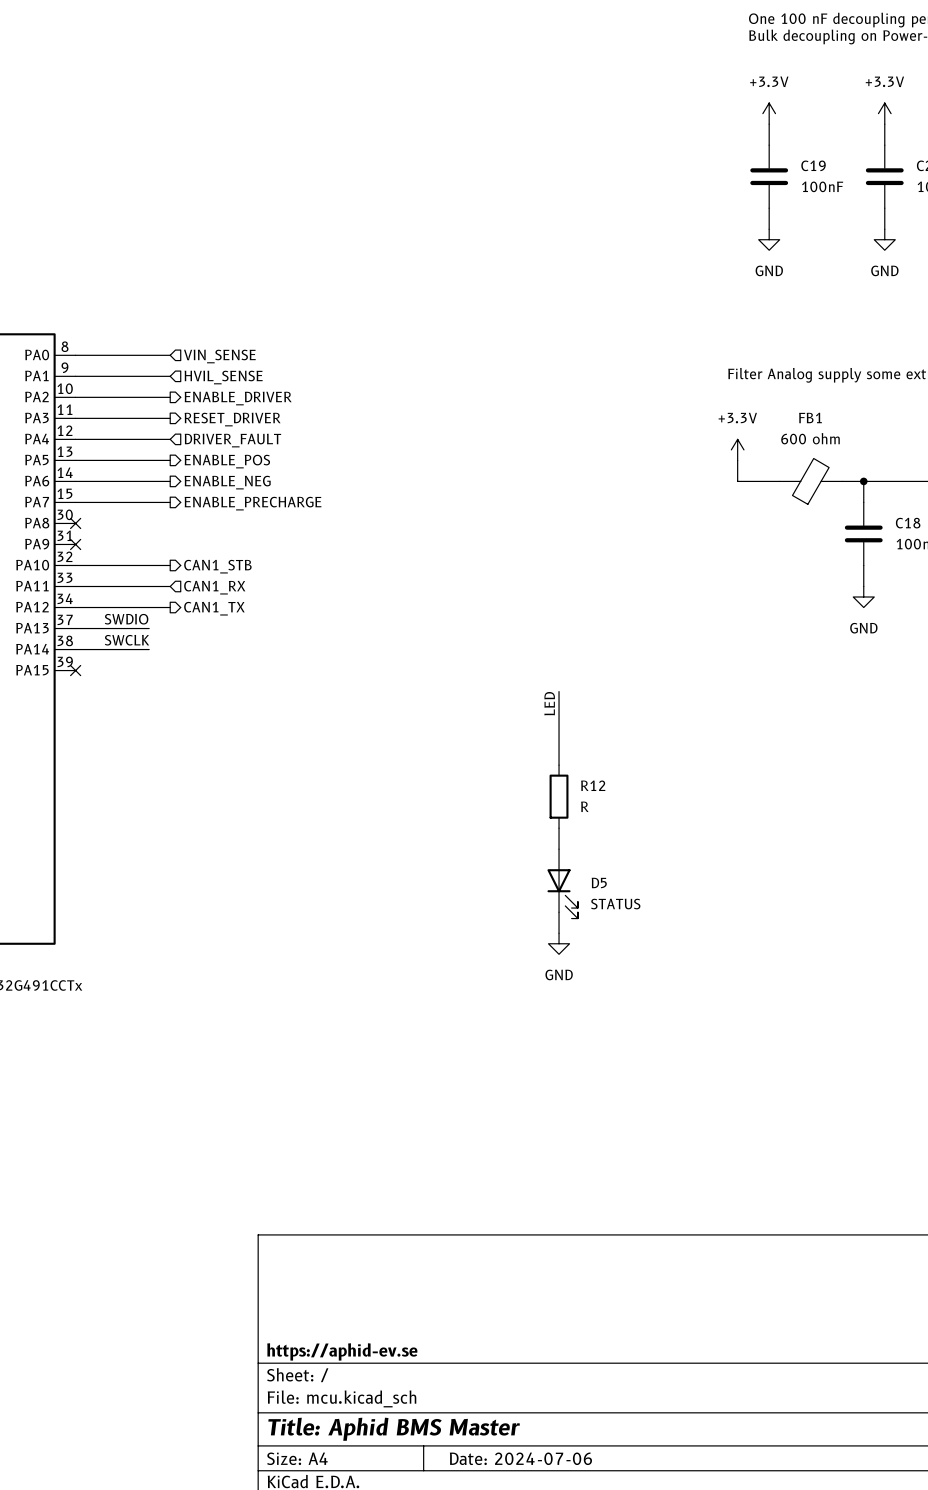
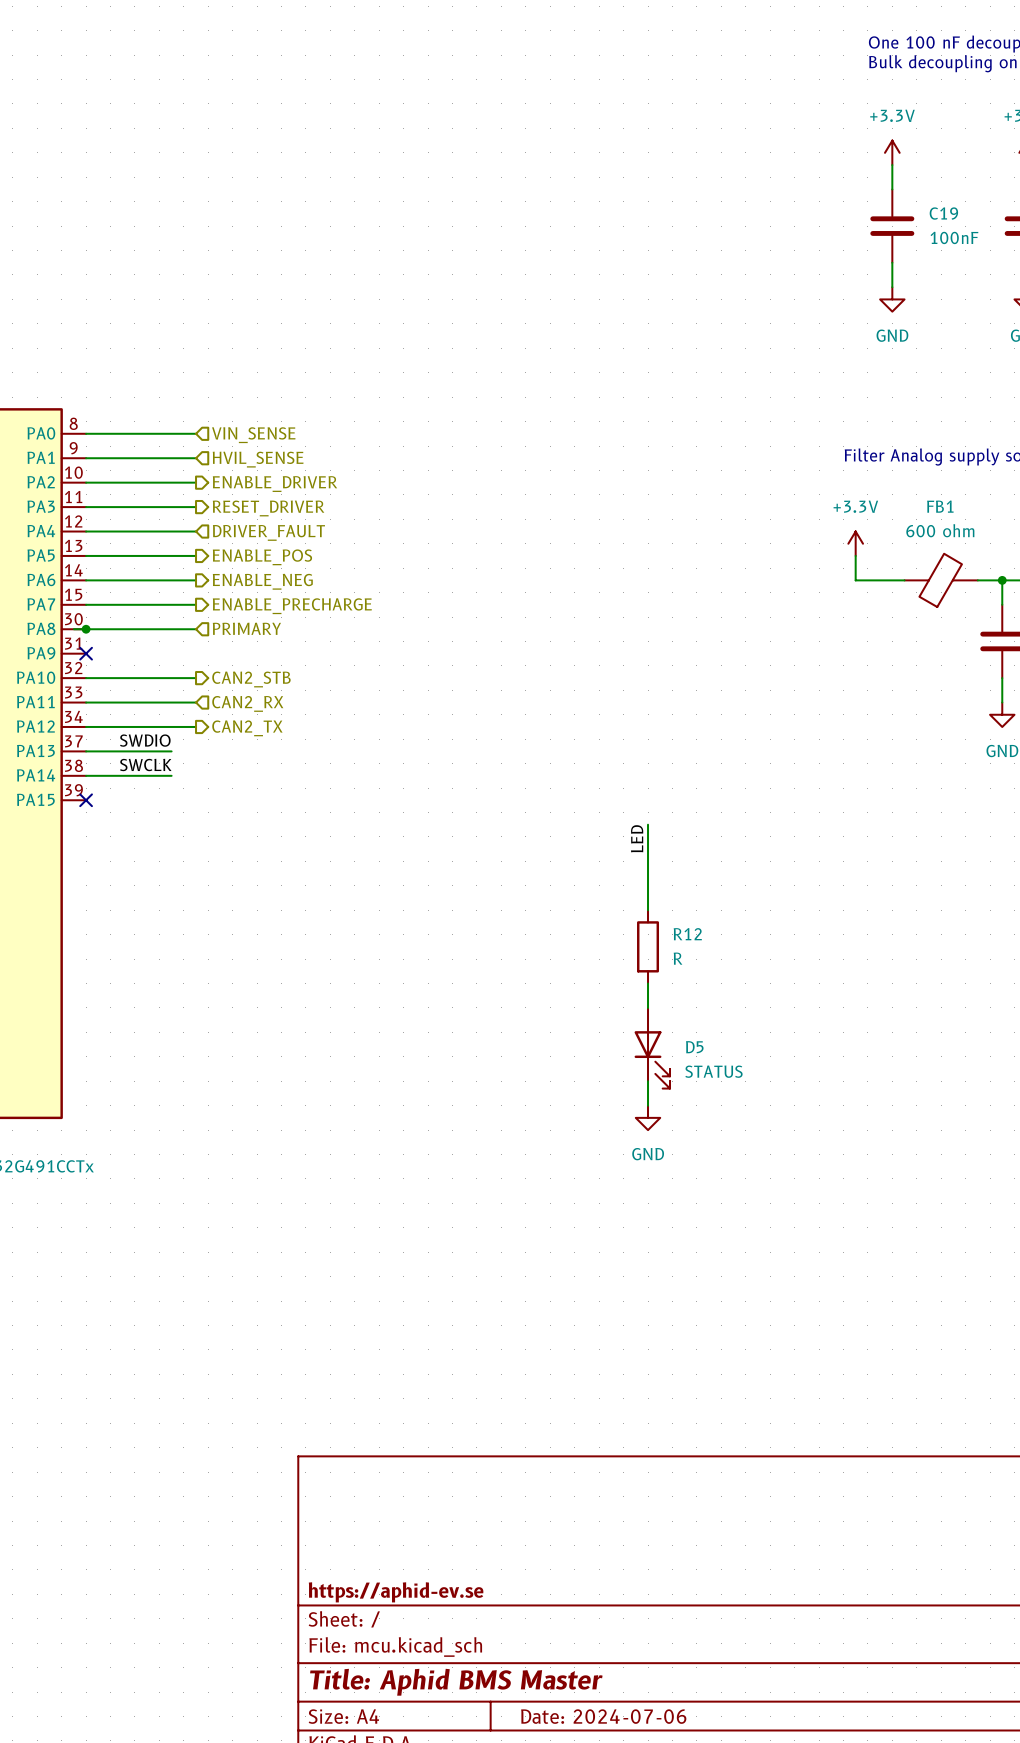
wire: none -> (73, 629) (196, 629)
no-connect mark: (75, 523) -> none
junction: none -> (86, 629)
hierarchical label: none -> PRIMARY (246, 628)
hierarchical label: CAN1_STB (217, 566) -> CAN2_STB (251, 679)
hierarchical label: CAN1_RX (214, 587) -> CAN2_RX (247, 703)
hierarchical label: CAN1_TX (214, 608) -> CAN2_TX (247, 728)

